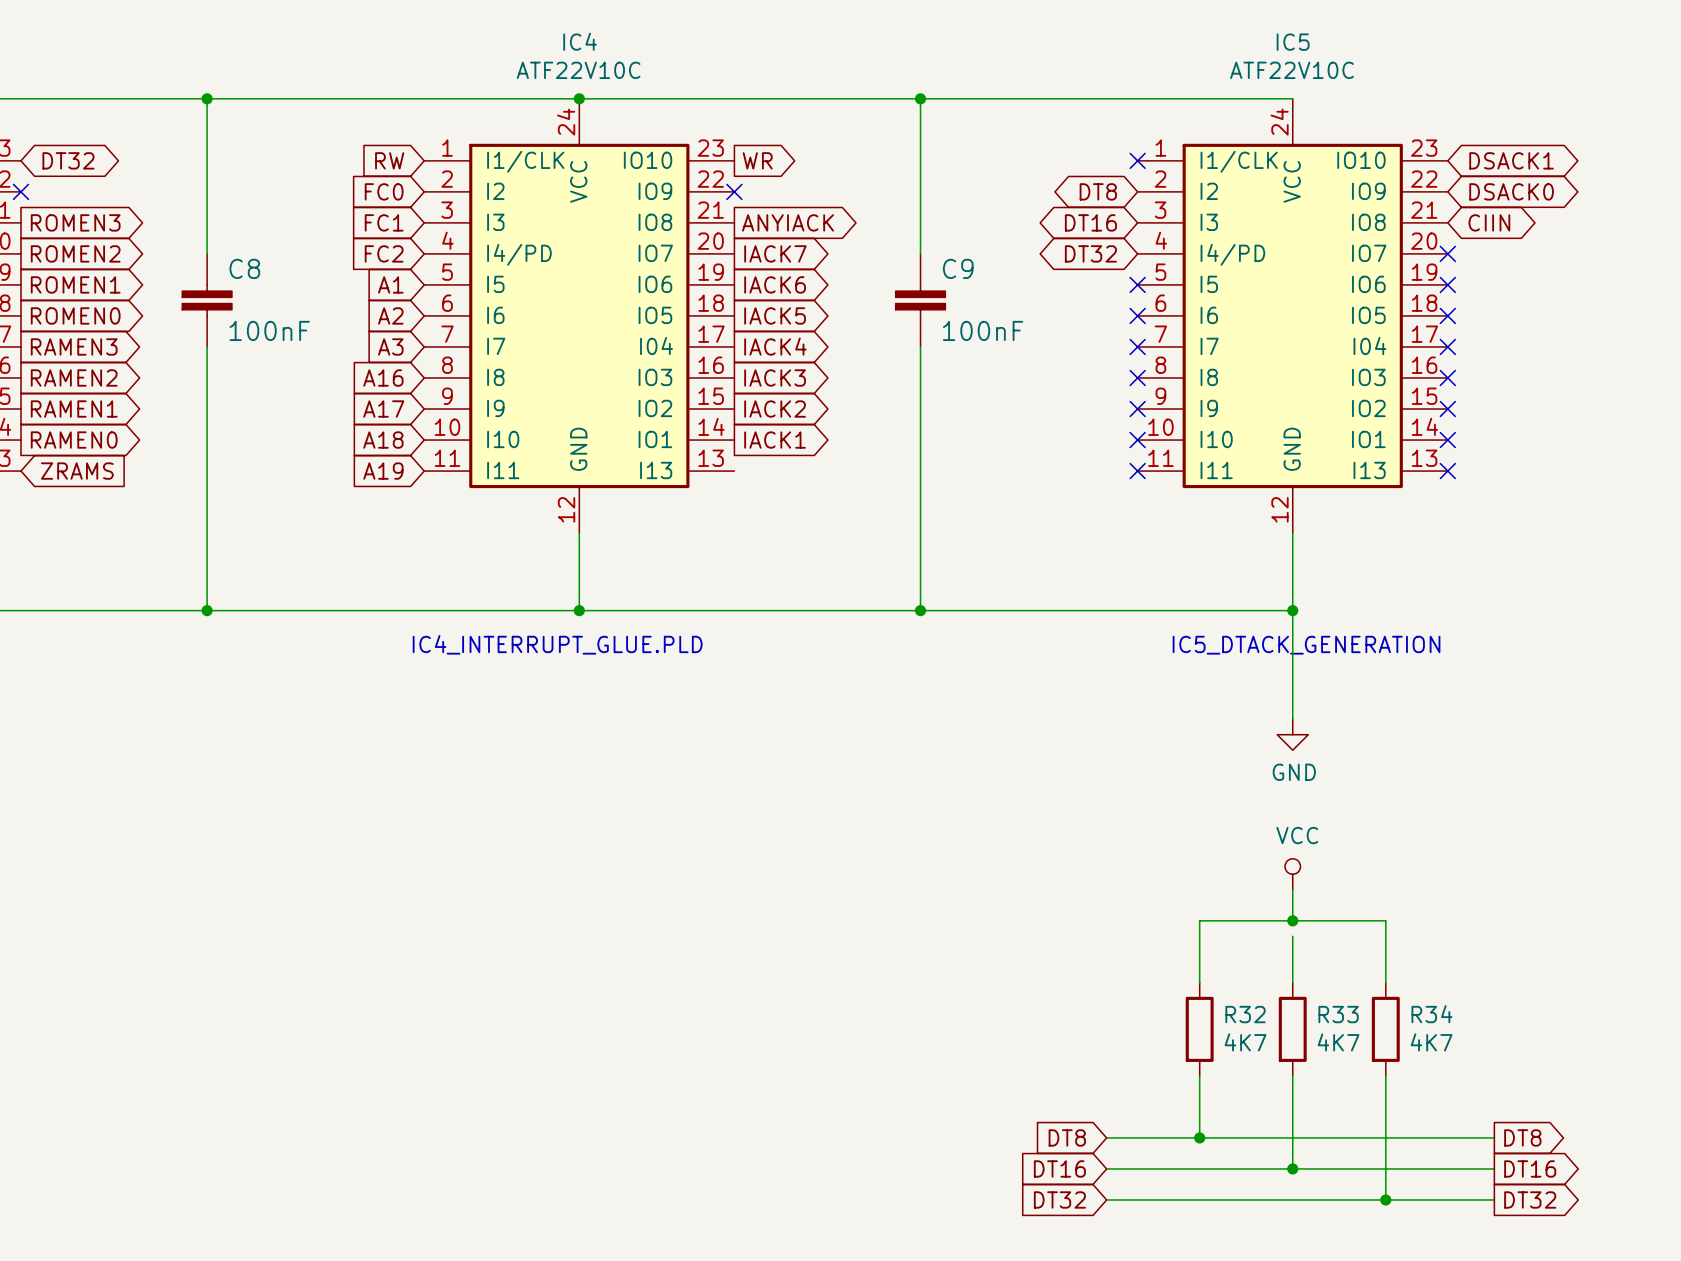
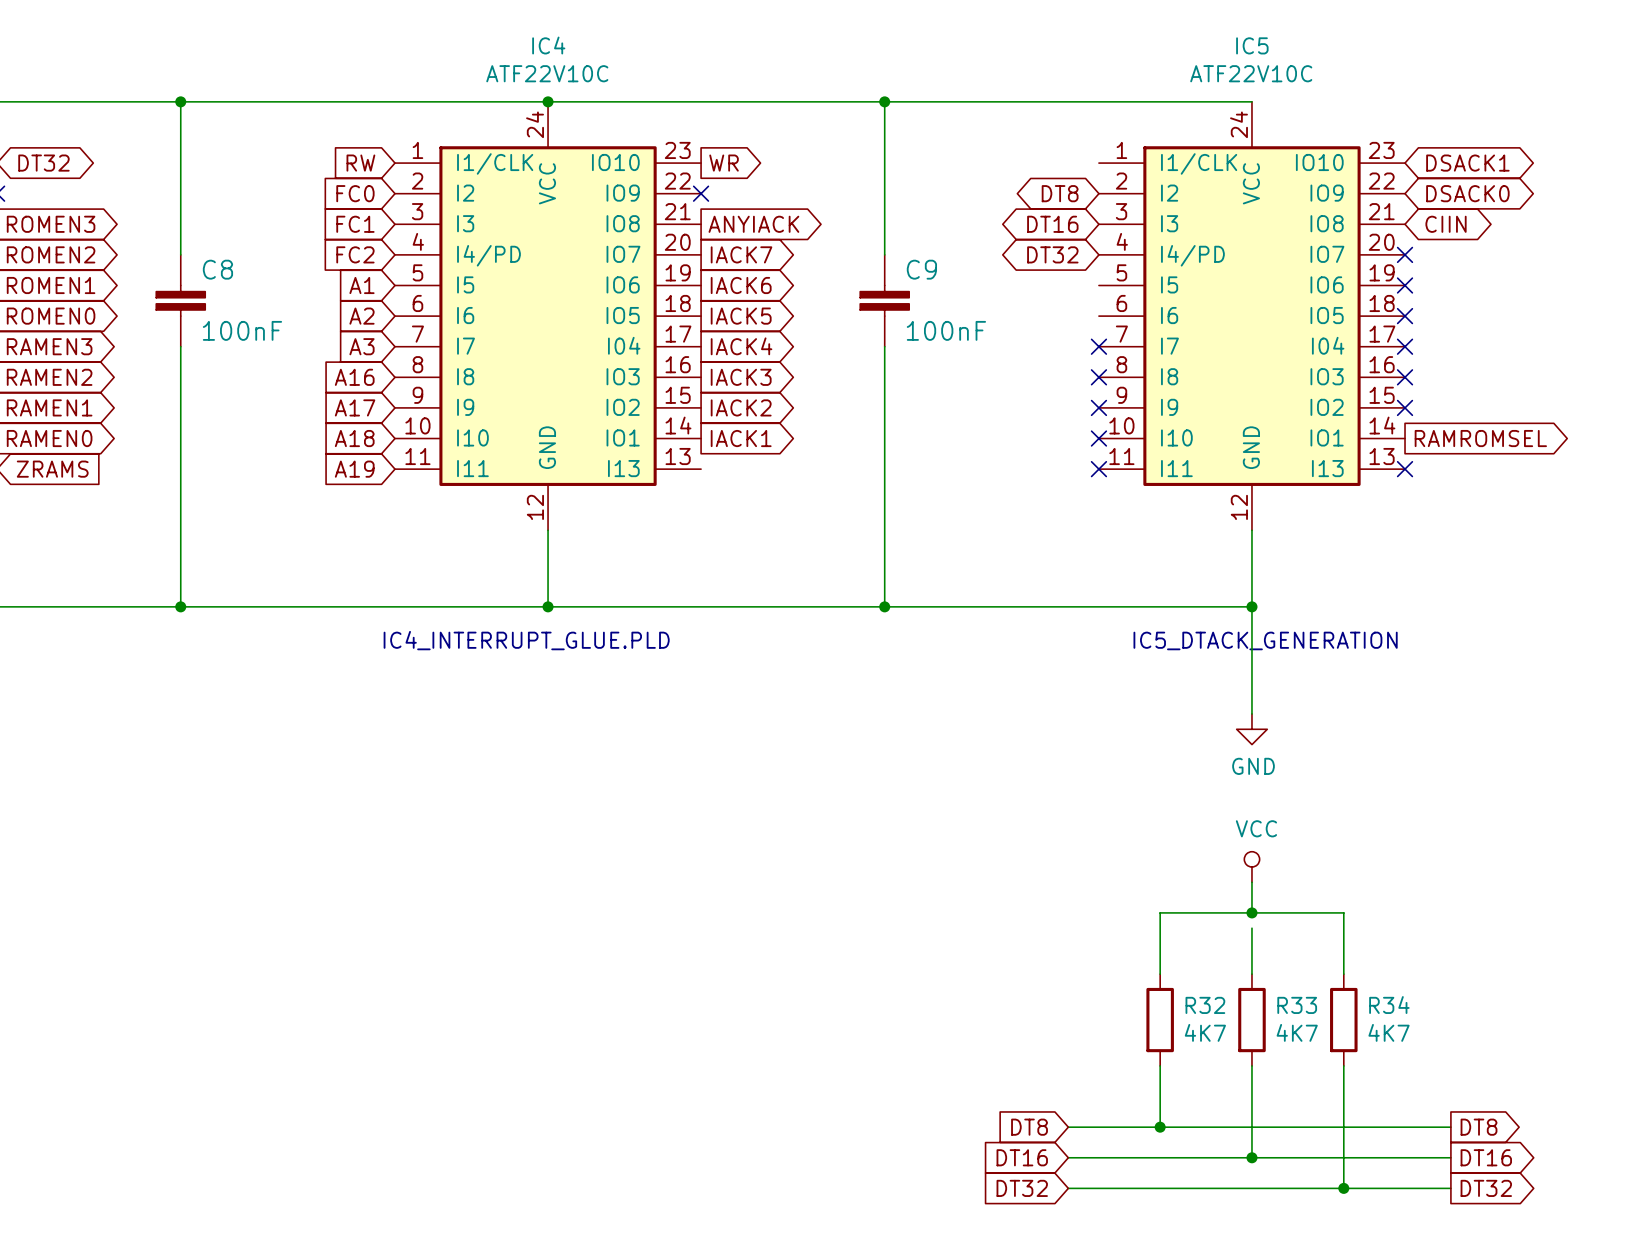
no-connect mark: (1137, 160) -> none
no-connect mark: (1137, 284) -> none
no-connect mark: (1137, 315) -> none
no-connect mark: (1447, 440) -> none
global label: none -> RAMROMSEL (1480, 438)

